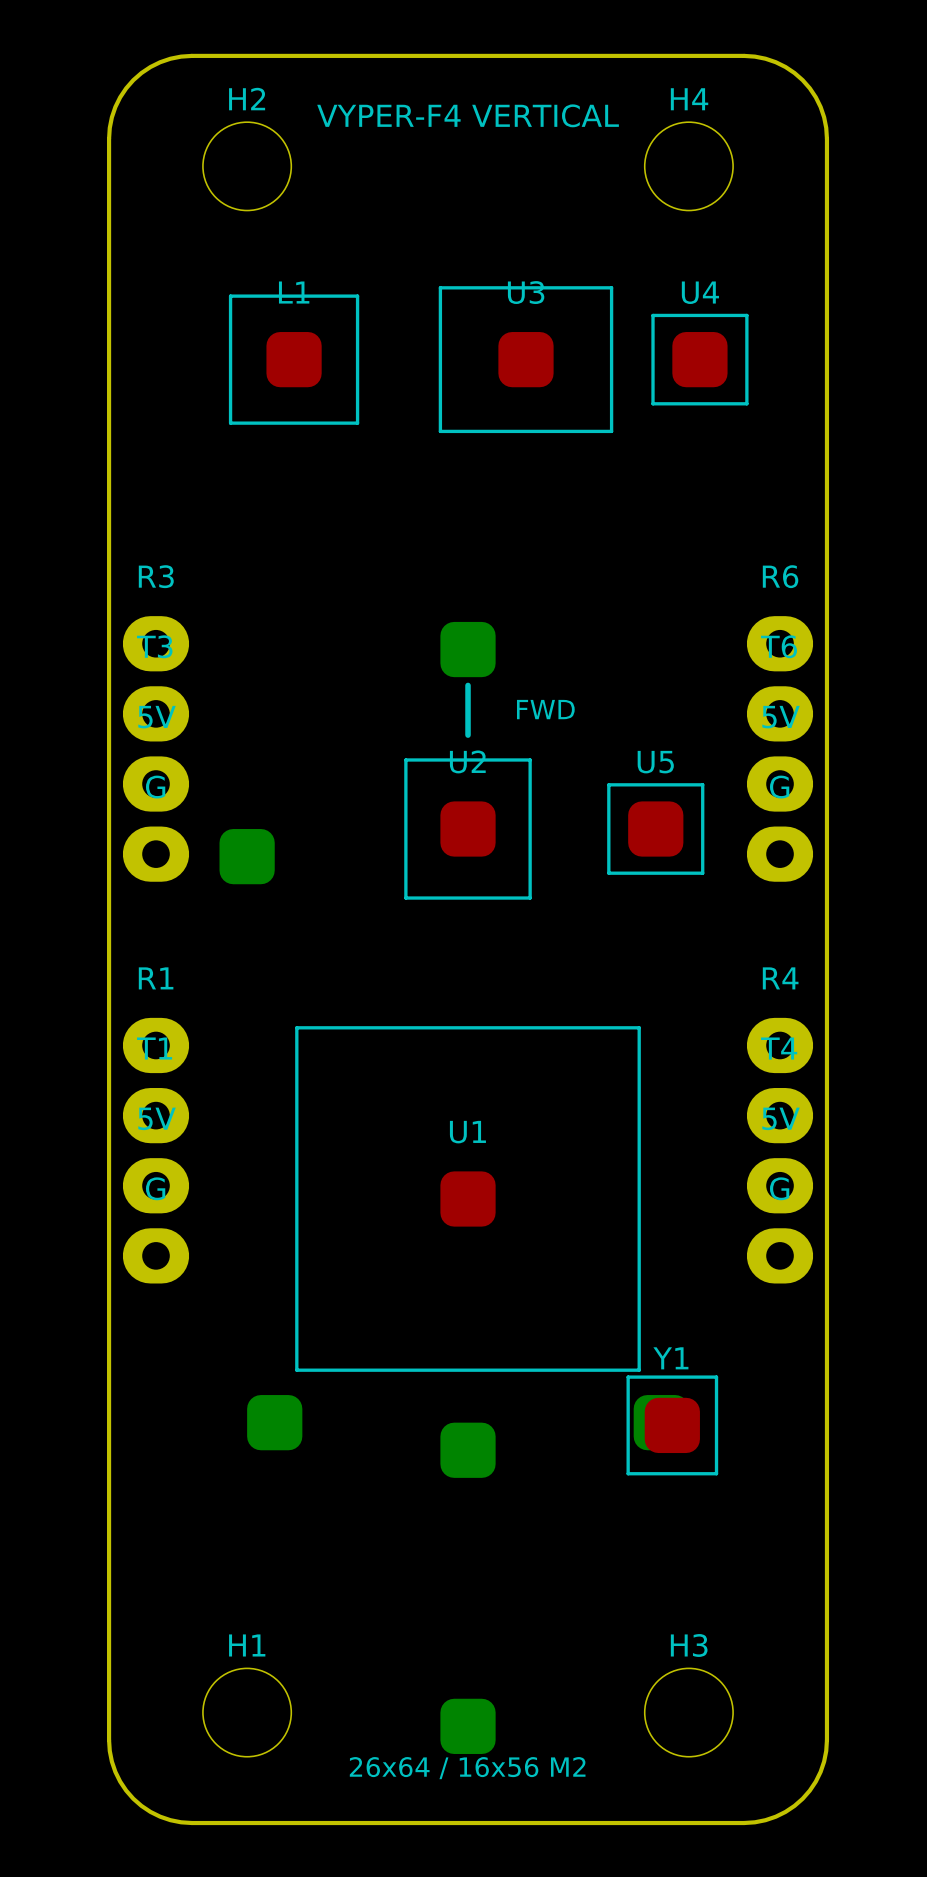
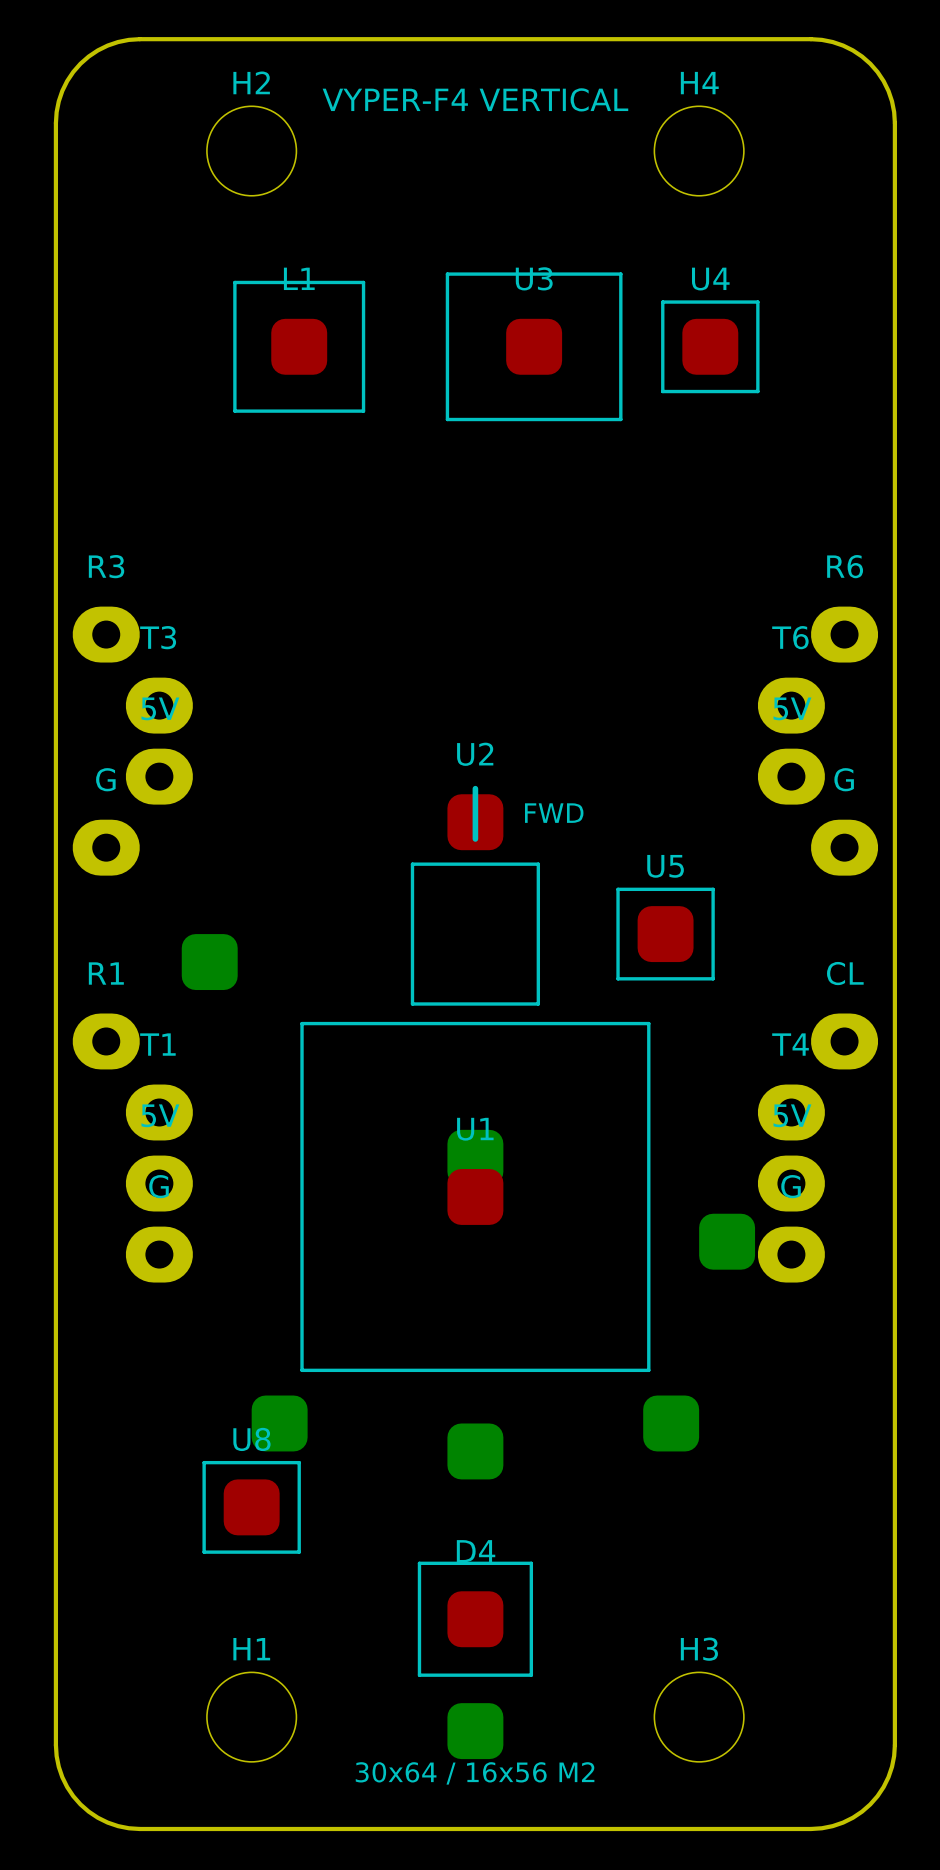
board edge: (191, 55) (160, 62) (133, 80) (115, 107) (109, 138) (109, 1740) (115, 1771) (133, 1798) (160, 1816) (191, 1823) -> (195, 39) (128, 39) (97, 50) (80, 63) (67, 81) (58, 101) (55, 123) (56, 1756) (62, 1777) (73, 1796) (97, 1817) (128, 1828) (195, 1828)
board edge: (744, 55) (775, 62) (802, 80) (820, 107) (826, 138) (826, 1740) (820, 1771) (802, 1798) (775, 1816) (744, 1823) -> (755, 39) (821, 39) (852, 50) (870, 63) (883, 81) (892, 101) (894, 123) (894, 1756) (883, 1787) (870, 1804) (852, 1817) (821, 1828) (755, 1828)
R3 position: (156, 643) -> (106, 634)
R6 position: (780, 643) -> (844, 634)
part: (468, 649) -> none
line: (468, 685) (468, 735) -> (475, 788) (475, 838)
text position: FWD (545, 709) -> FWD (554, 813)
line: (608, 784) (702, 784) (702, 873) (608, 873) (608, 784) -> (618, 889) (713, 889) (713, 978) (618, 978) (618, 889)
U5 position: (655, 829) -> (665, 934)
G position: (156, 854) -> (106, 847)
G position: (780, 854) -> (844, 847)
part position: (247, 856) -> (209, 962)
line: (405, 870) (405, 759) (530, 759) (530, 870) -> (412, 864) (538, 864)
line: (405, 898) (530, 898) -> (412, 892) (412, 1003) (538, 1003) (538, 892)
R1 position: (156, 1045) -> (106, 1041)
R4: (780, 1045) -> none
CL: none -> (844, 1041)
part: none -> (475, 1157)
part: none -> (727, 1241)
line: (628, 1377) (716, 1377) (716, 1473) (628, 1473) (628, 1377) -> none
Y1: (672, 1425) -> none
line: none -> (204, 1462) (299, 1462) (299, 1552) (204, 1552) (204, 1462)
U8: none -> (251, 1507)
line: none -> (419, 1563) (531, 1563) (531, 1675) (419, 1675) (419, 1563)
D4: none -> (475, 1619)
text: 26x64 / 16x56 M2 (467, 1768) -> 30x64 / 16x56 M2 (475, 1773)

